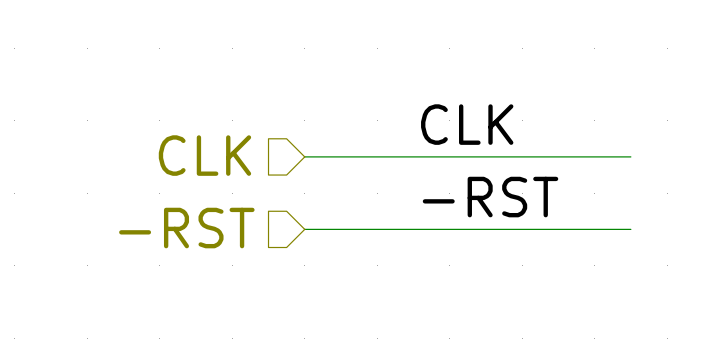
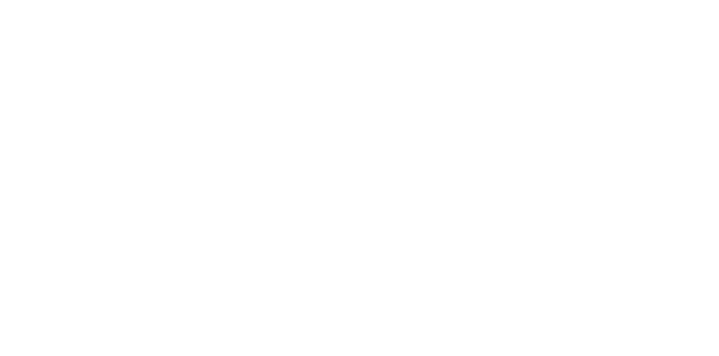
label: CLK (467, 124) -> none
hierarchical label: CLK (204, 155) -> none
wire: (304, 156) (630, 156) -> none
label: -RST (490, 197) -> none
hierarchical label: -RST (186, 228) -> none
wire: (304, 229) (630, 229) -> none

